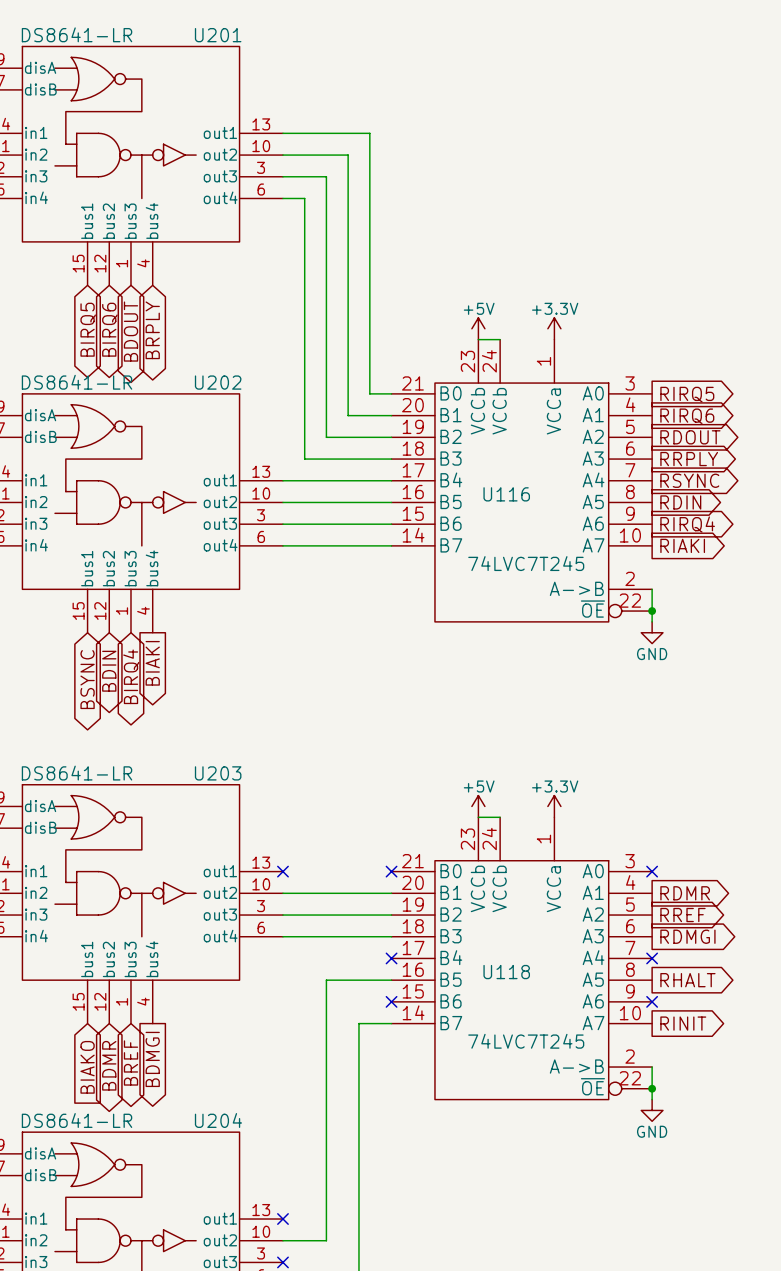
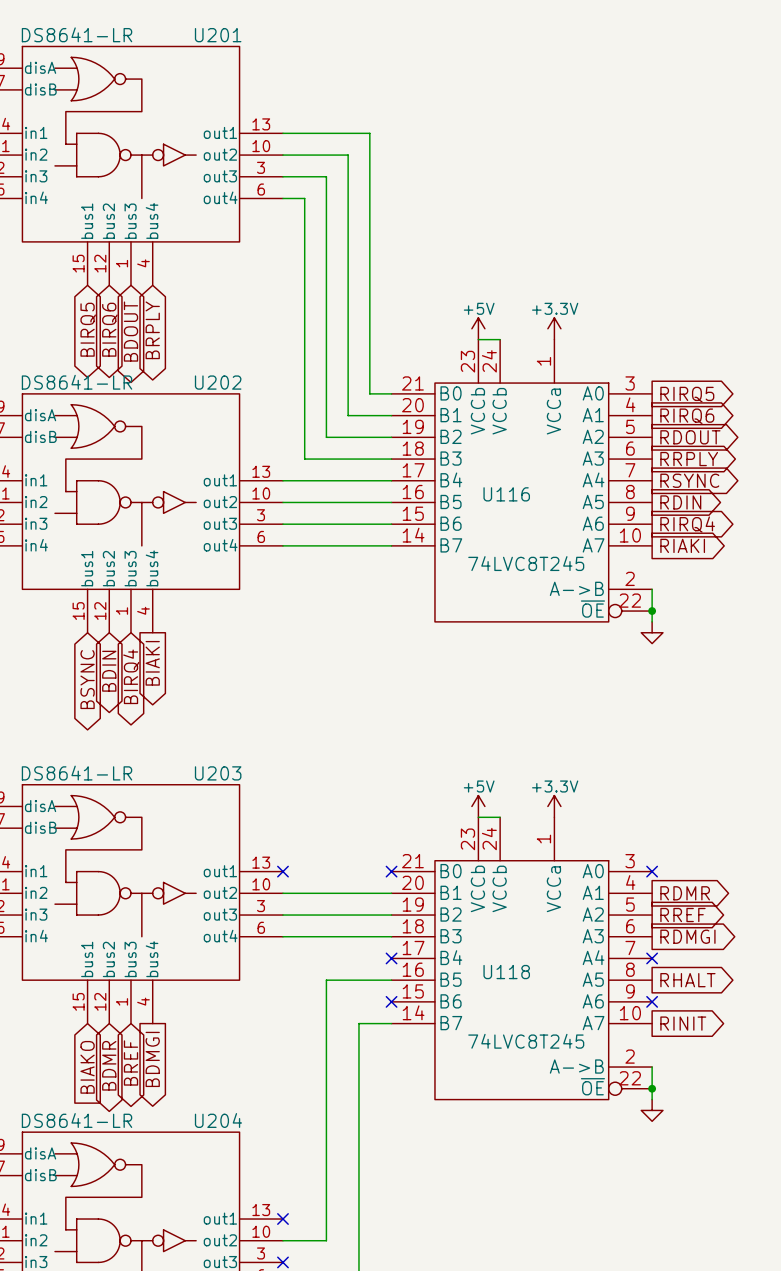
U116 value: 74LVC7T245 (526, 563) -> 74LVC8T245 (526, 563)
power symbol text: GND (652, 654) -> none
U118 value: 74LVC7T245 (526, 1041) -> 74LVC8T245 (526, 1041)
power symbol text: GND (652, 1131) -> none

